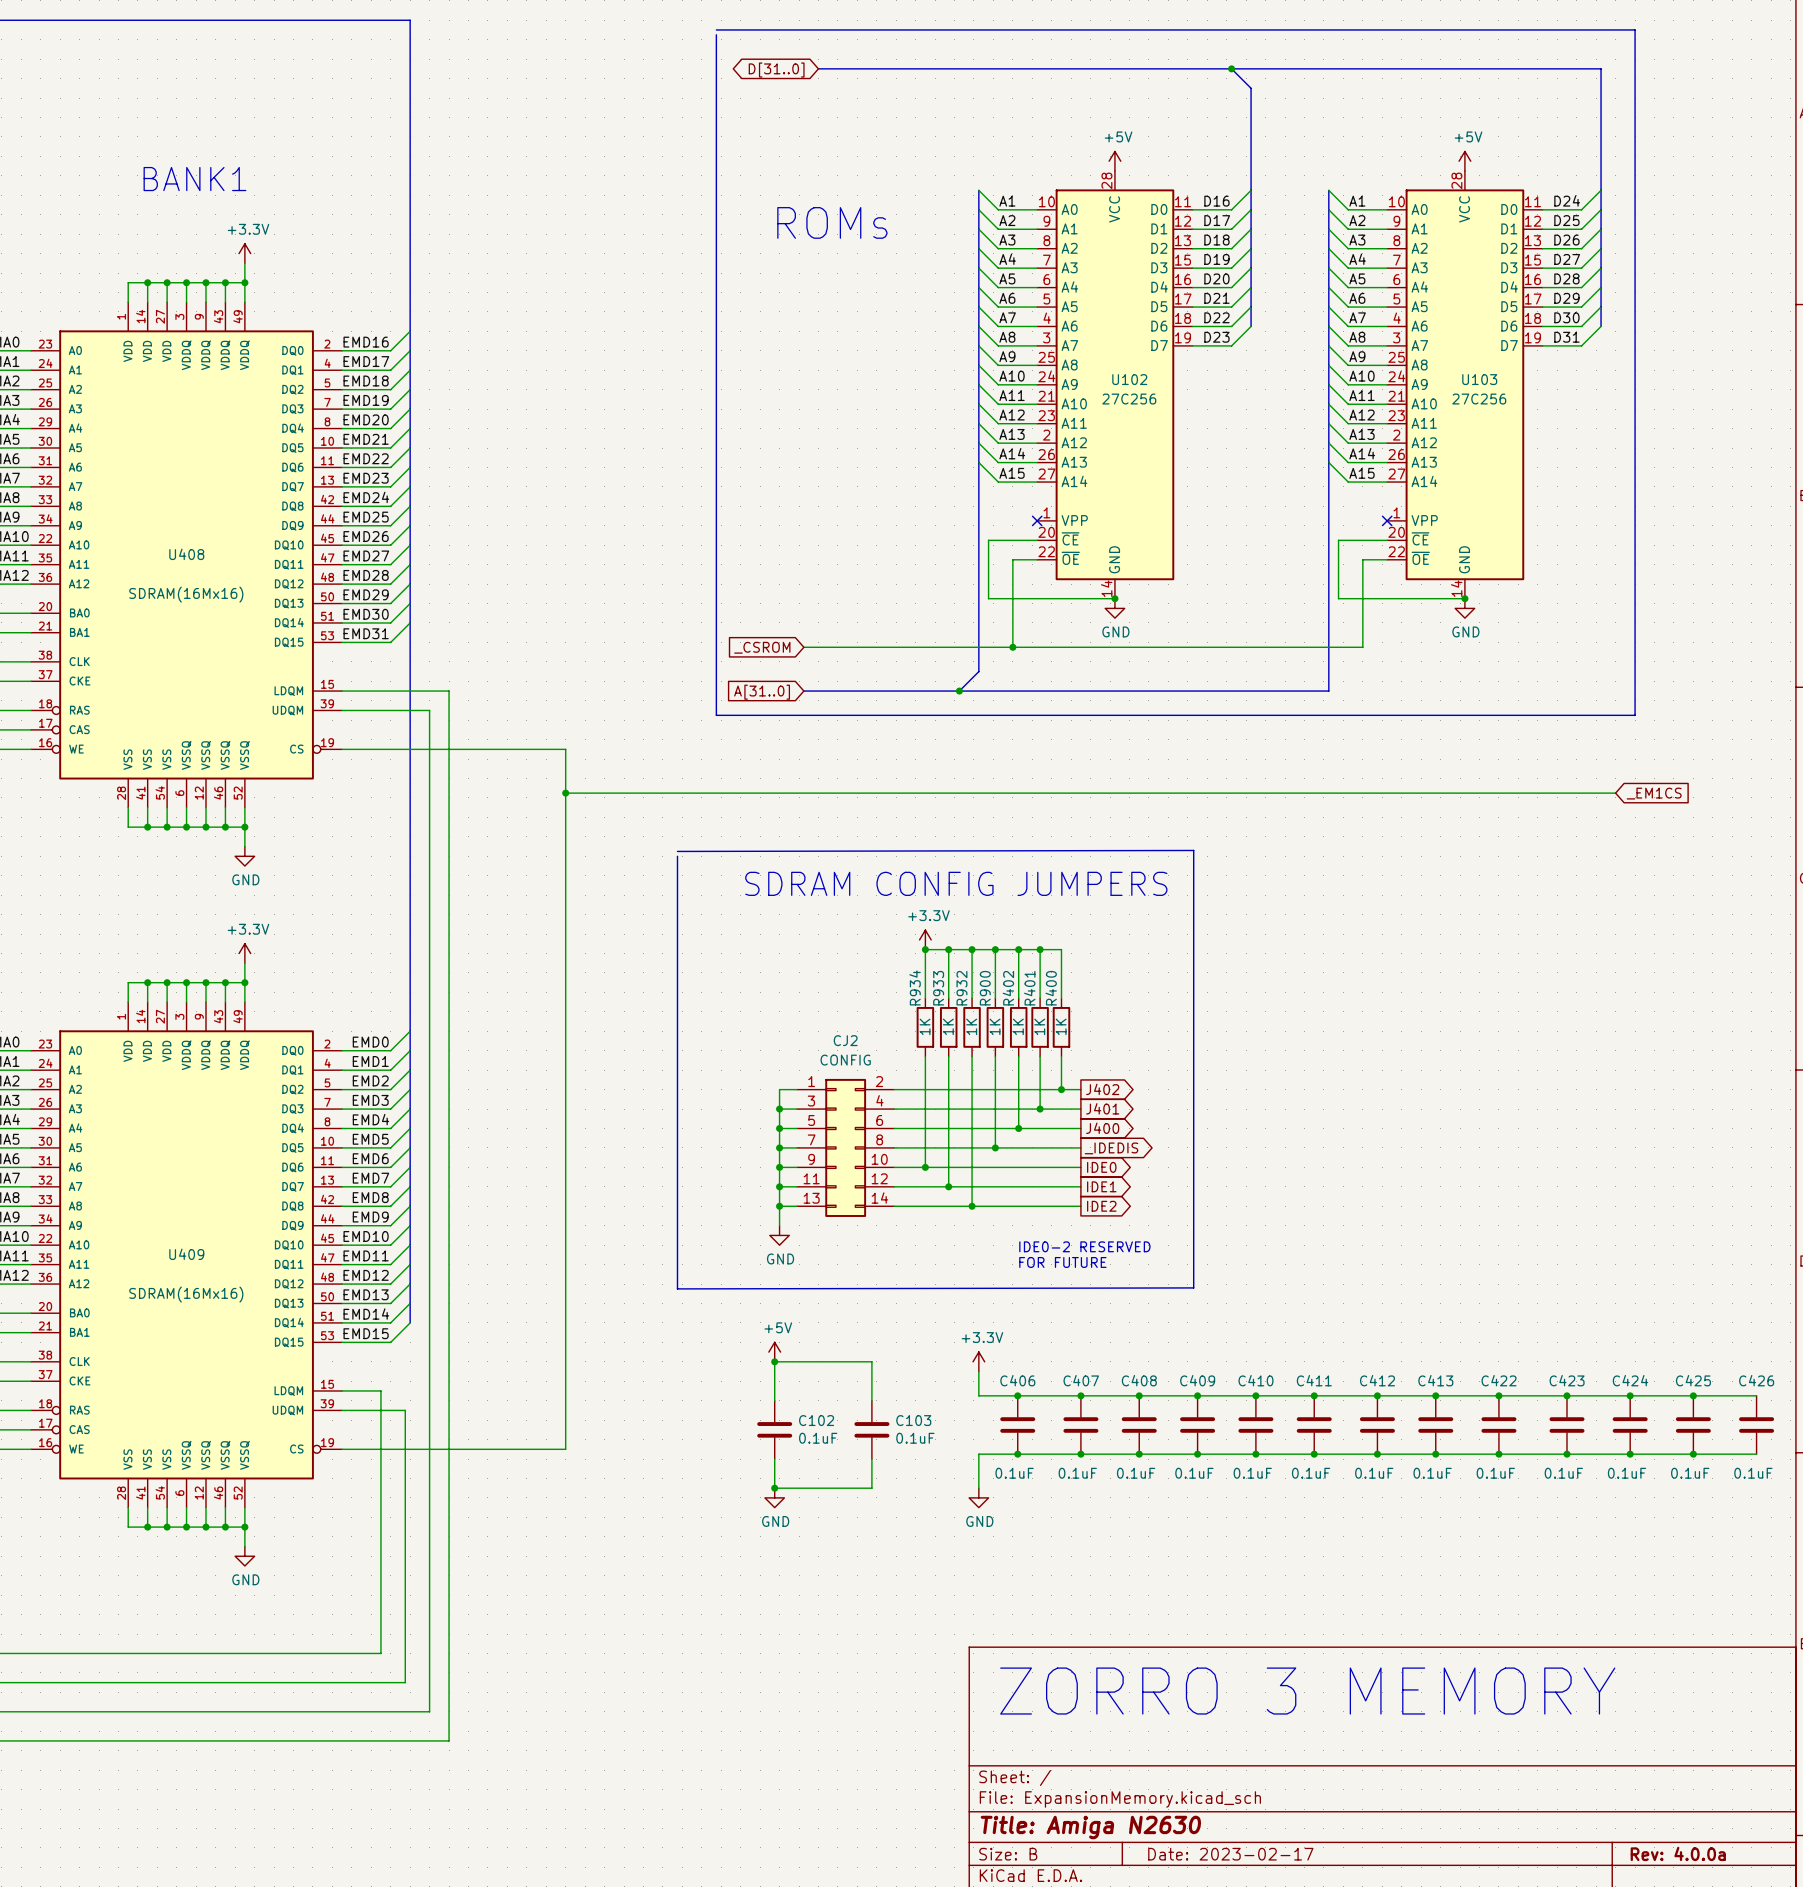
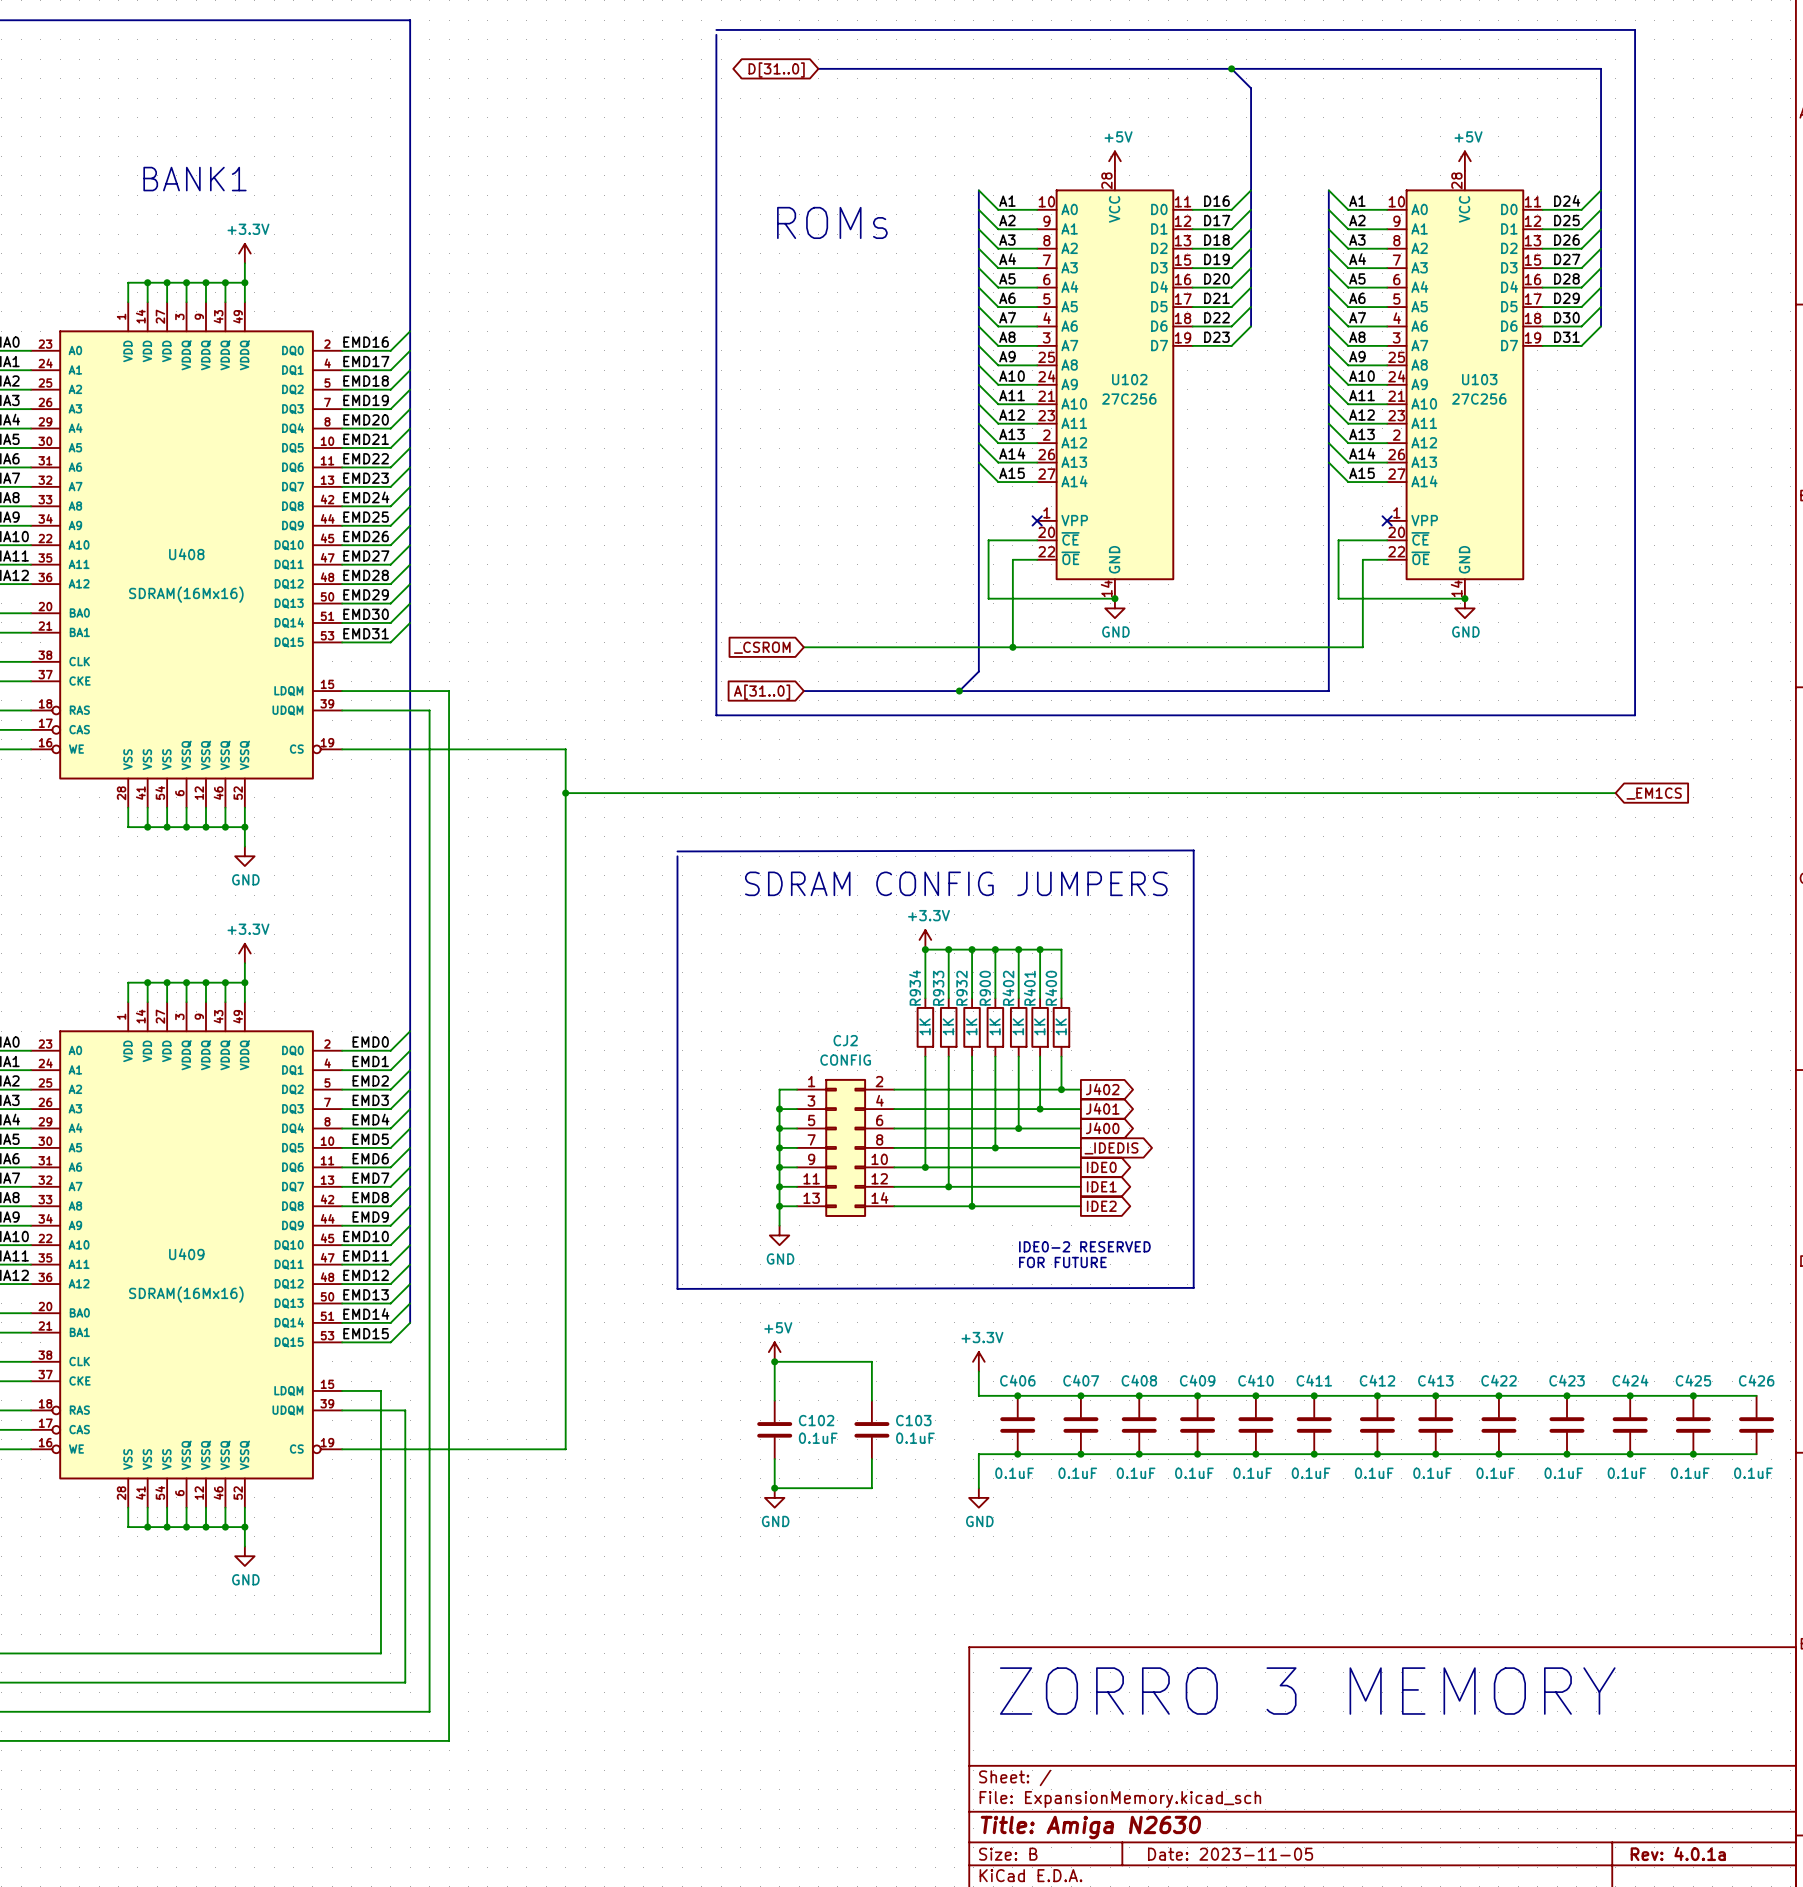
title block: Rev: 4.0.0a (1678, 1853) -> Rev: 4.0.1a (1678, 1853)
title block: Date: 2023-02-17 (1230, 1854) -> Date: 2023-11-05 (1230, 1854)

